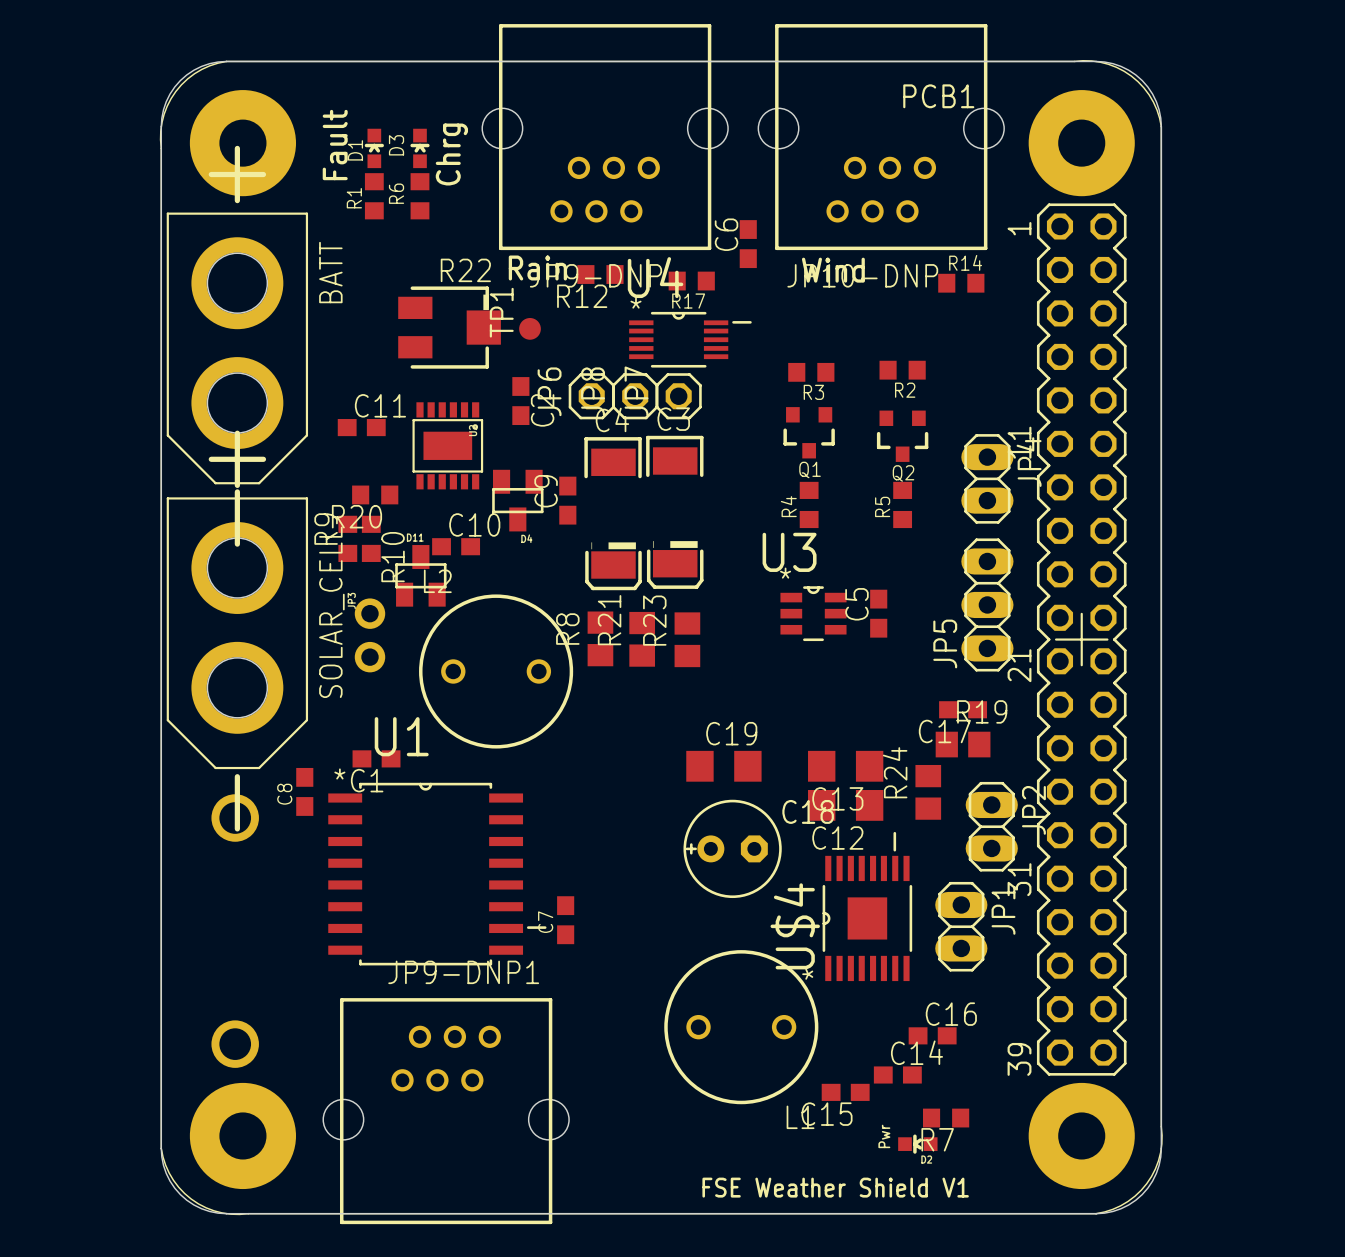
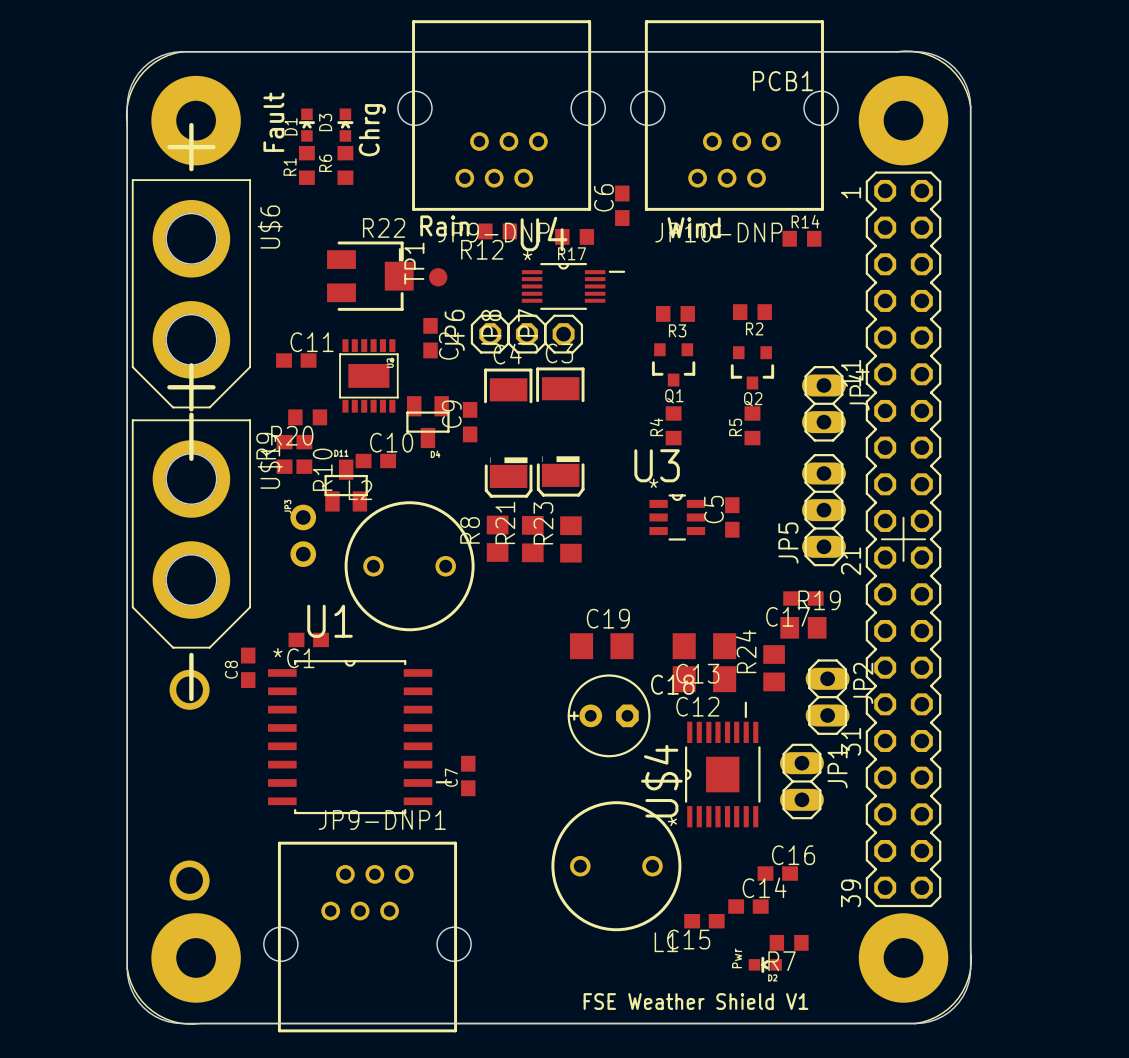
BATT name: BATT (330, 272) -> U$6 (270, 227)
SOLAR_CELL name: SOLAR_CELL (331, 612) -> U$1 (270, 467)

